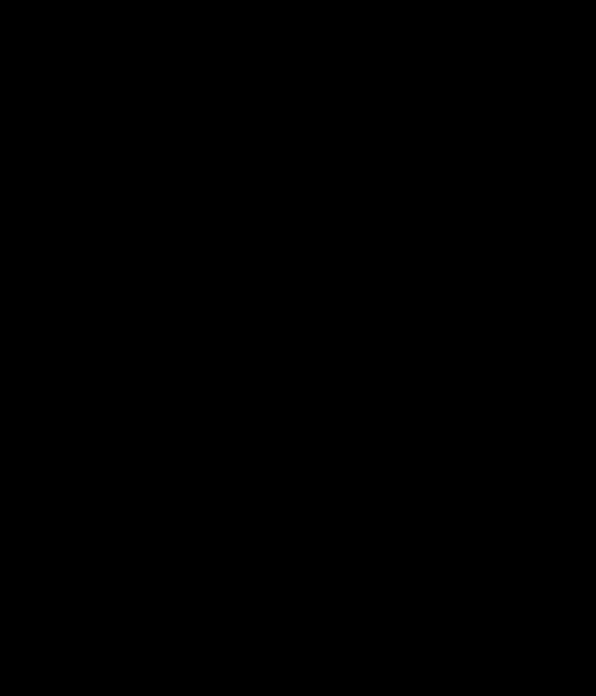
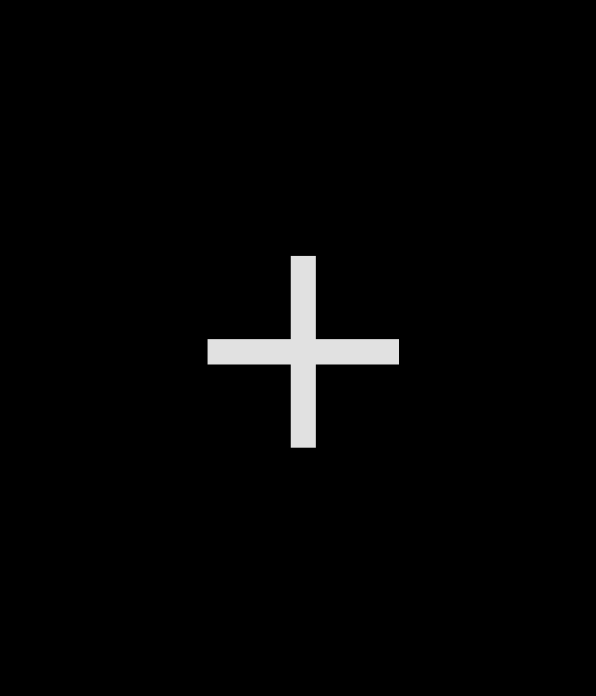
text: none -> + (303, 351)

